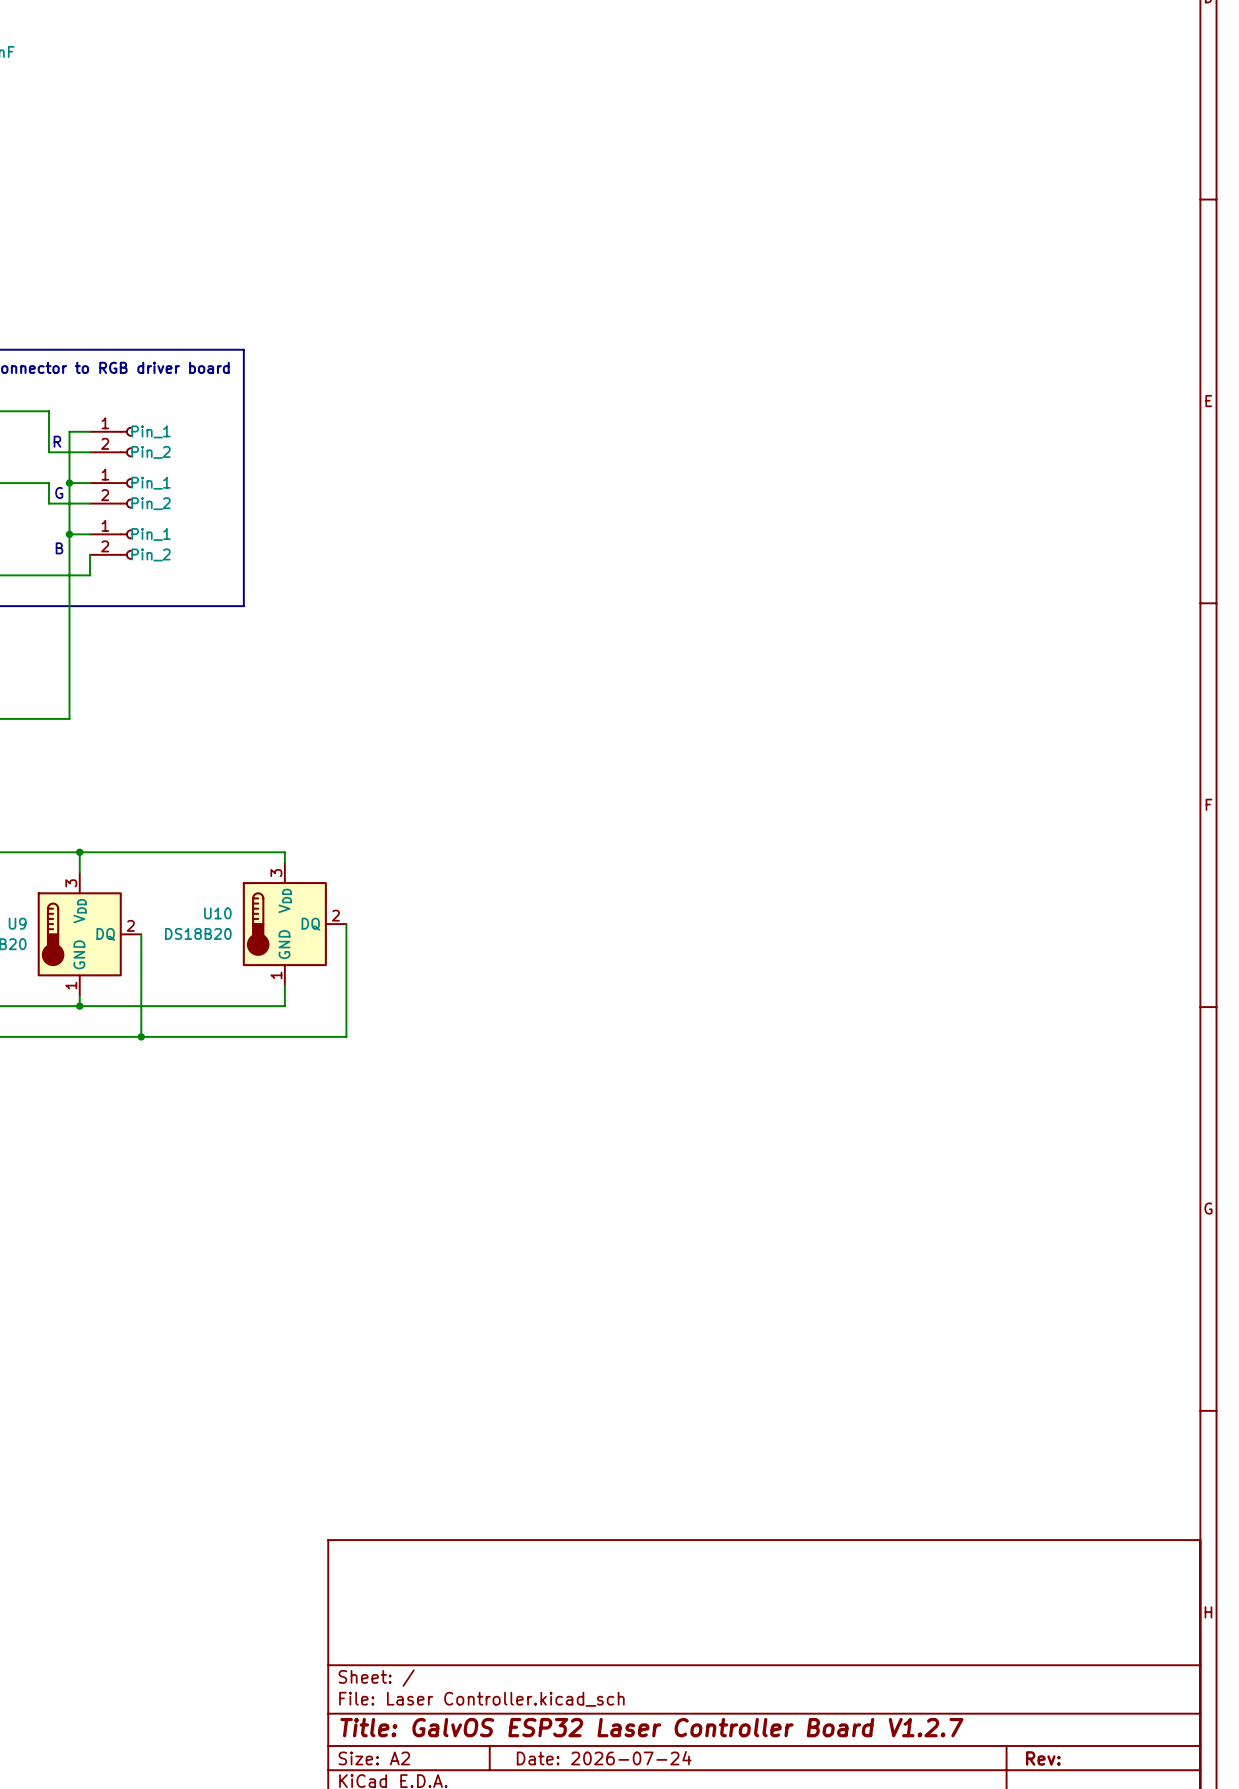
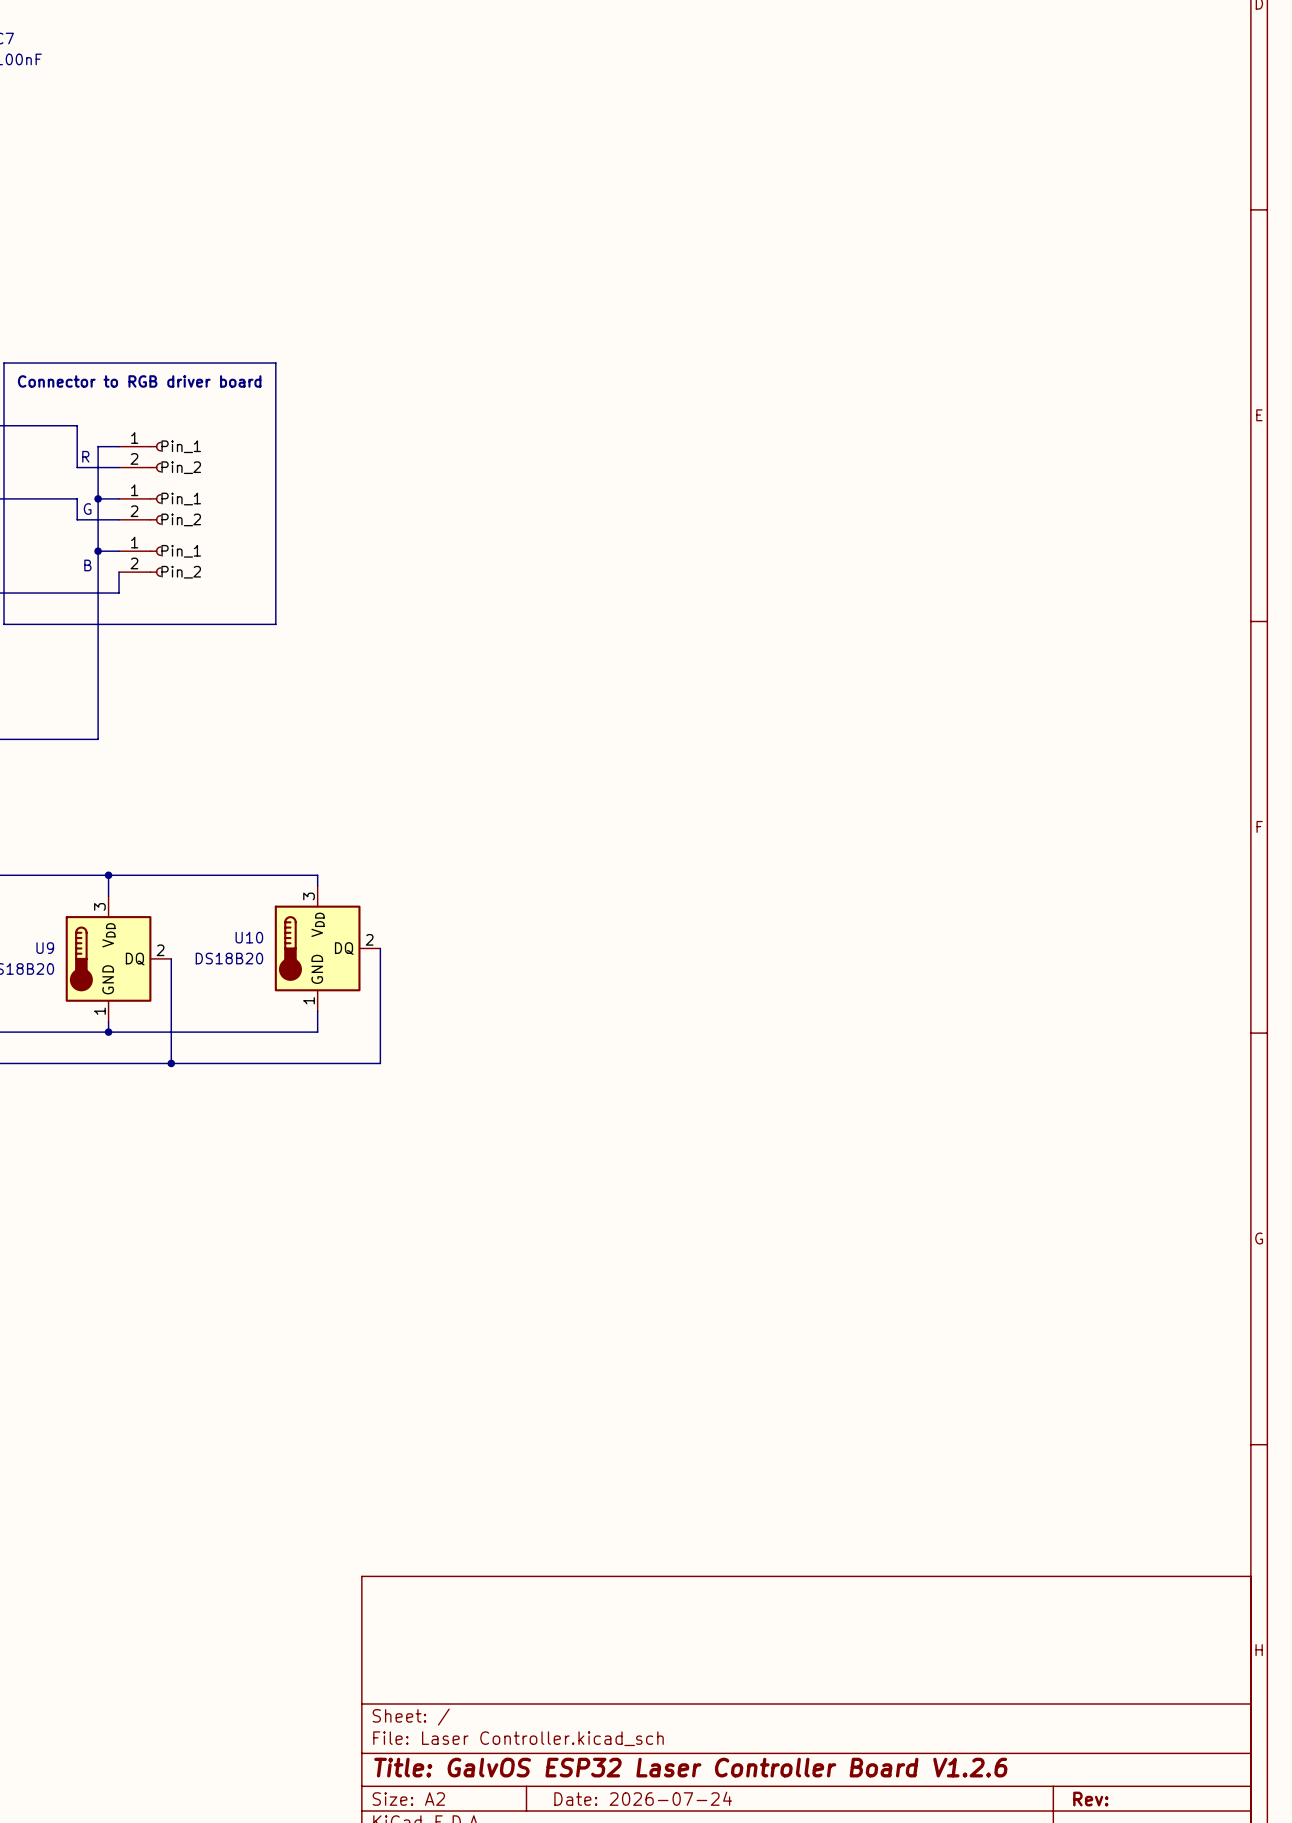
title block: Title: GalvOS ESP32 Laser Controller Board V1.2.7 (651, 1727) -> Title: GalvOS ESP32 Laser Controller Board V1.2.6 (690, 1767)

